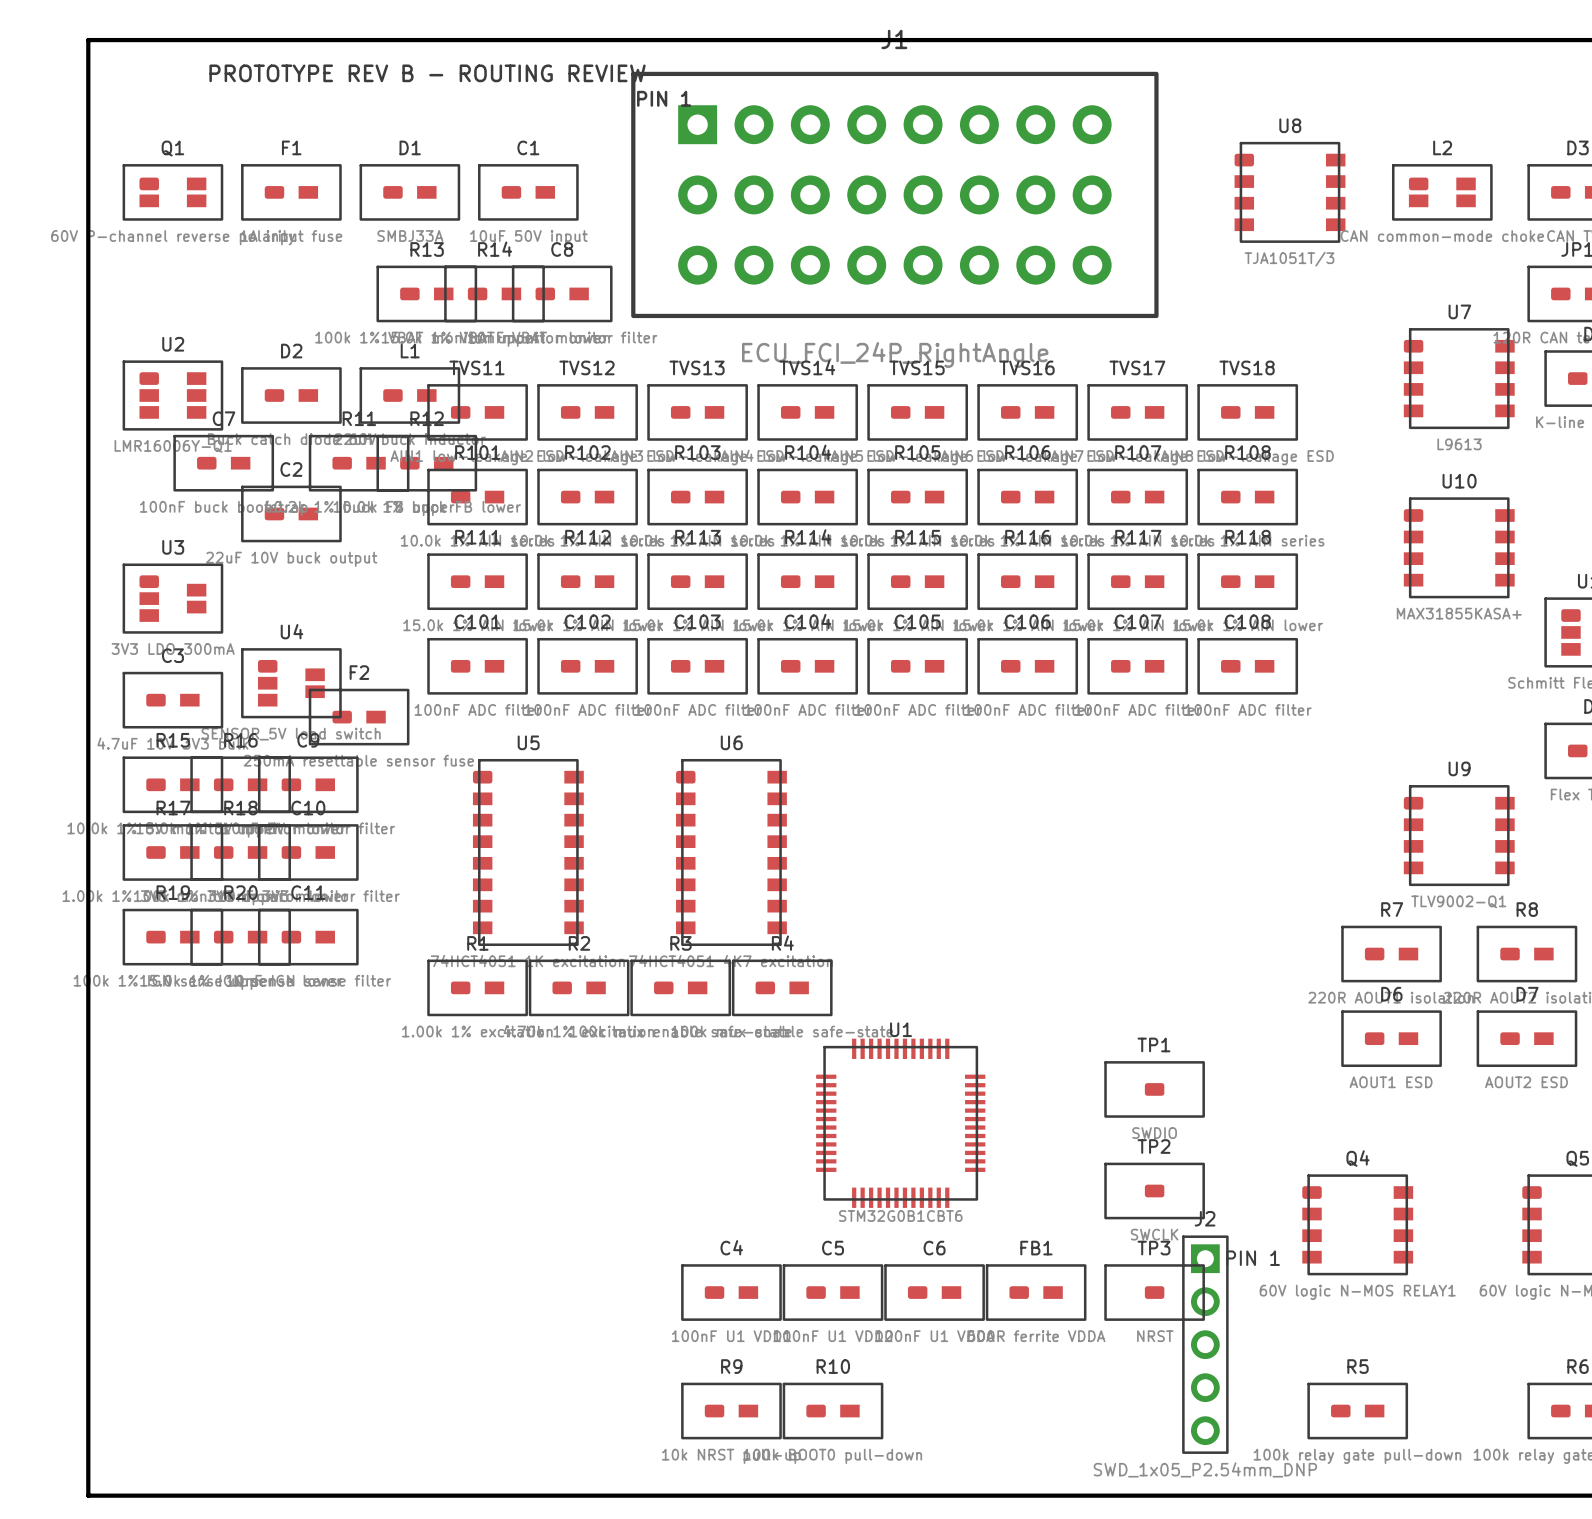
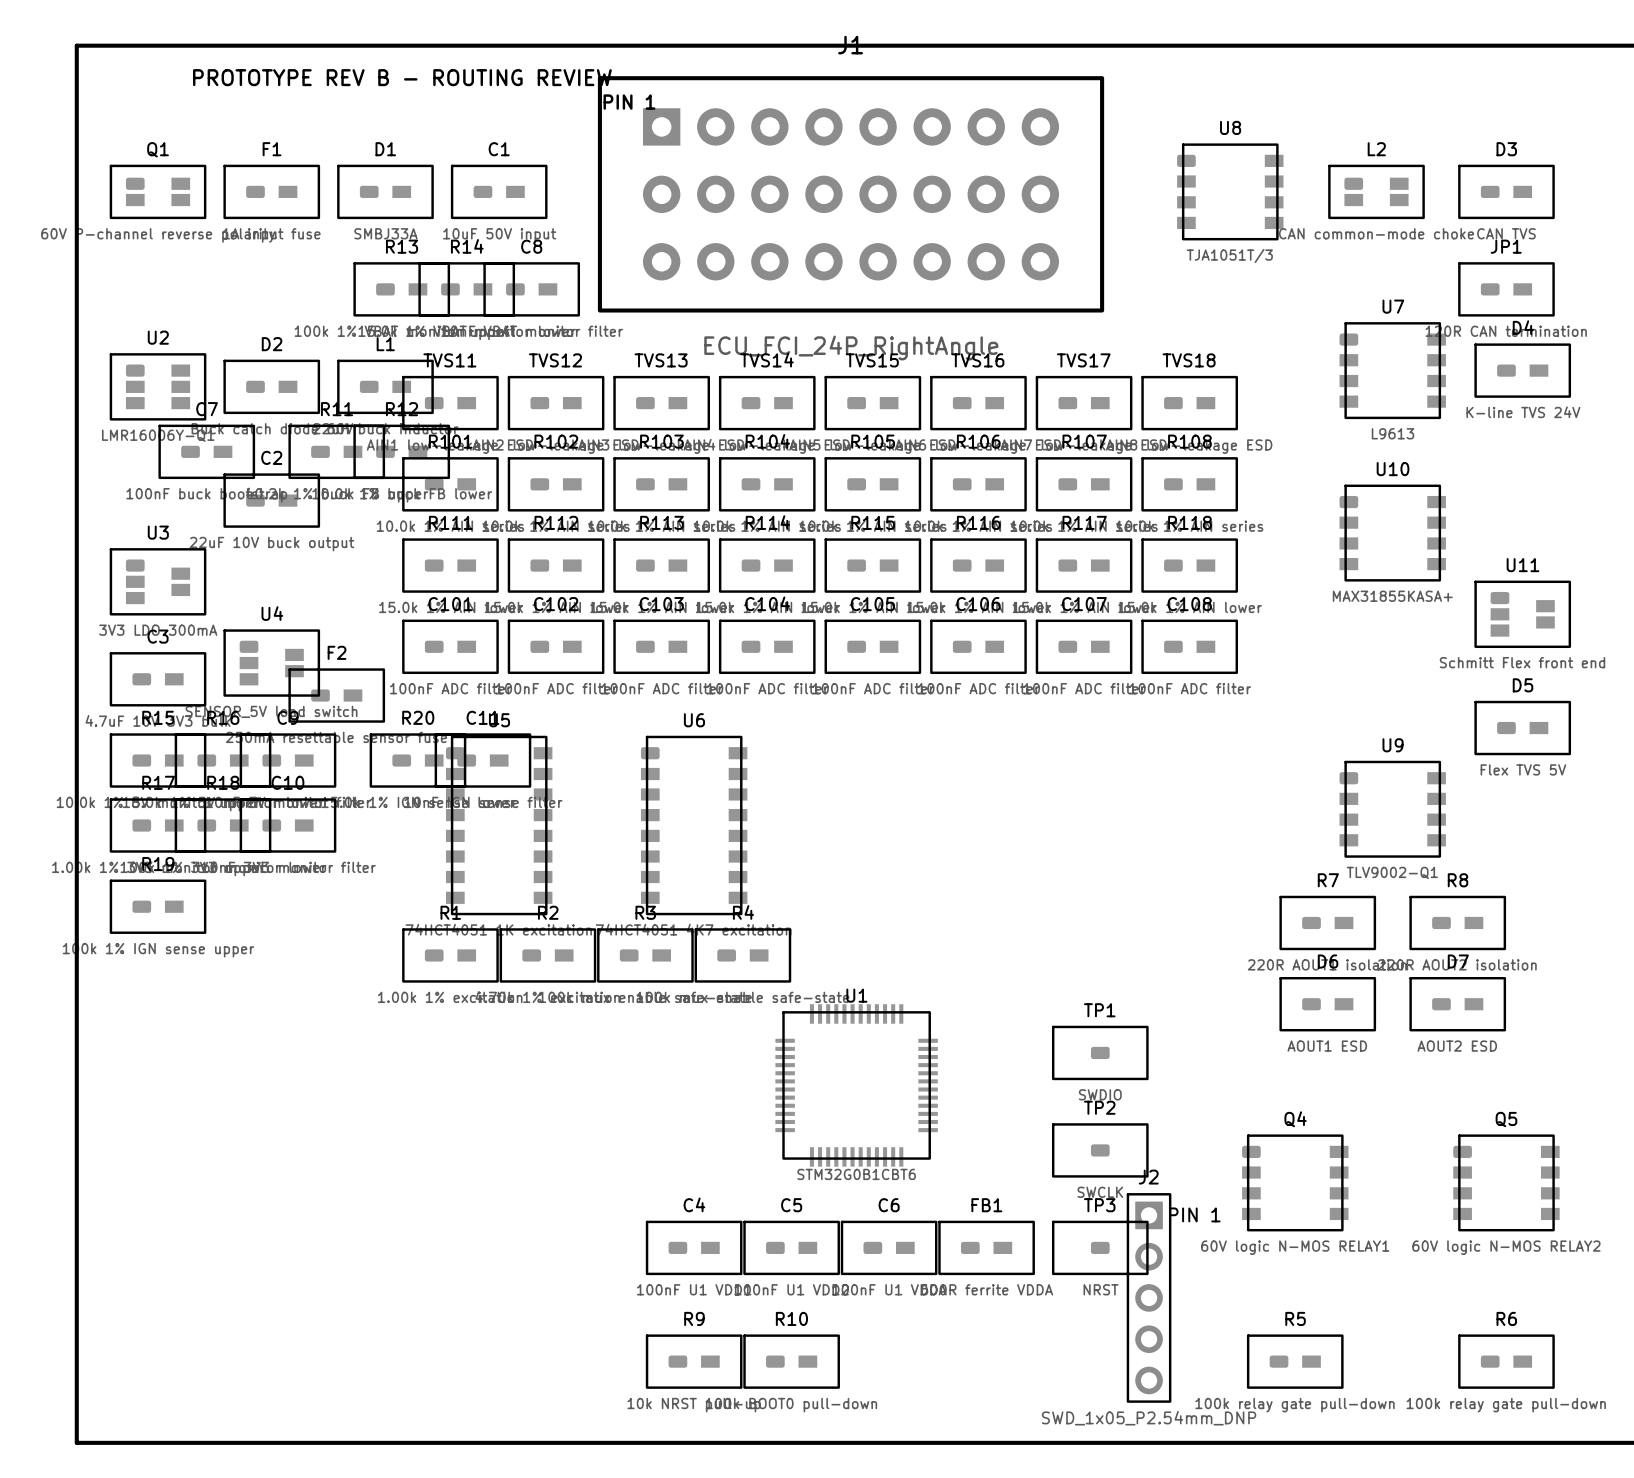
R20 position: (240, 937) -> (417, 760)
C11 position: (308, 937) -> (482, 760)

